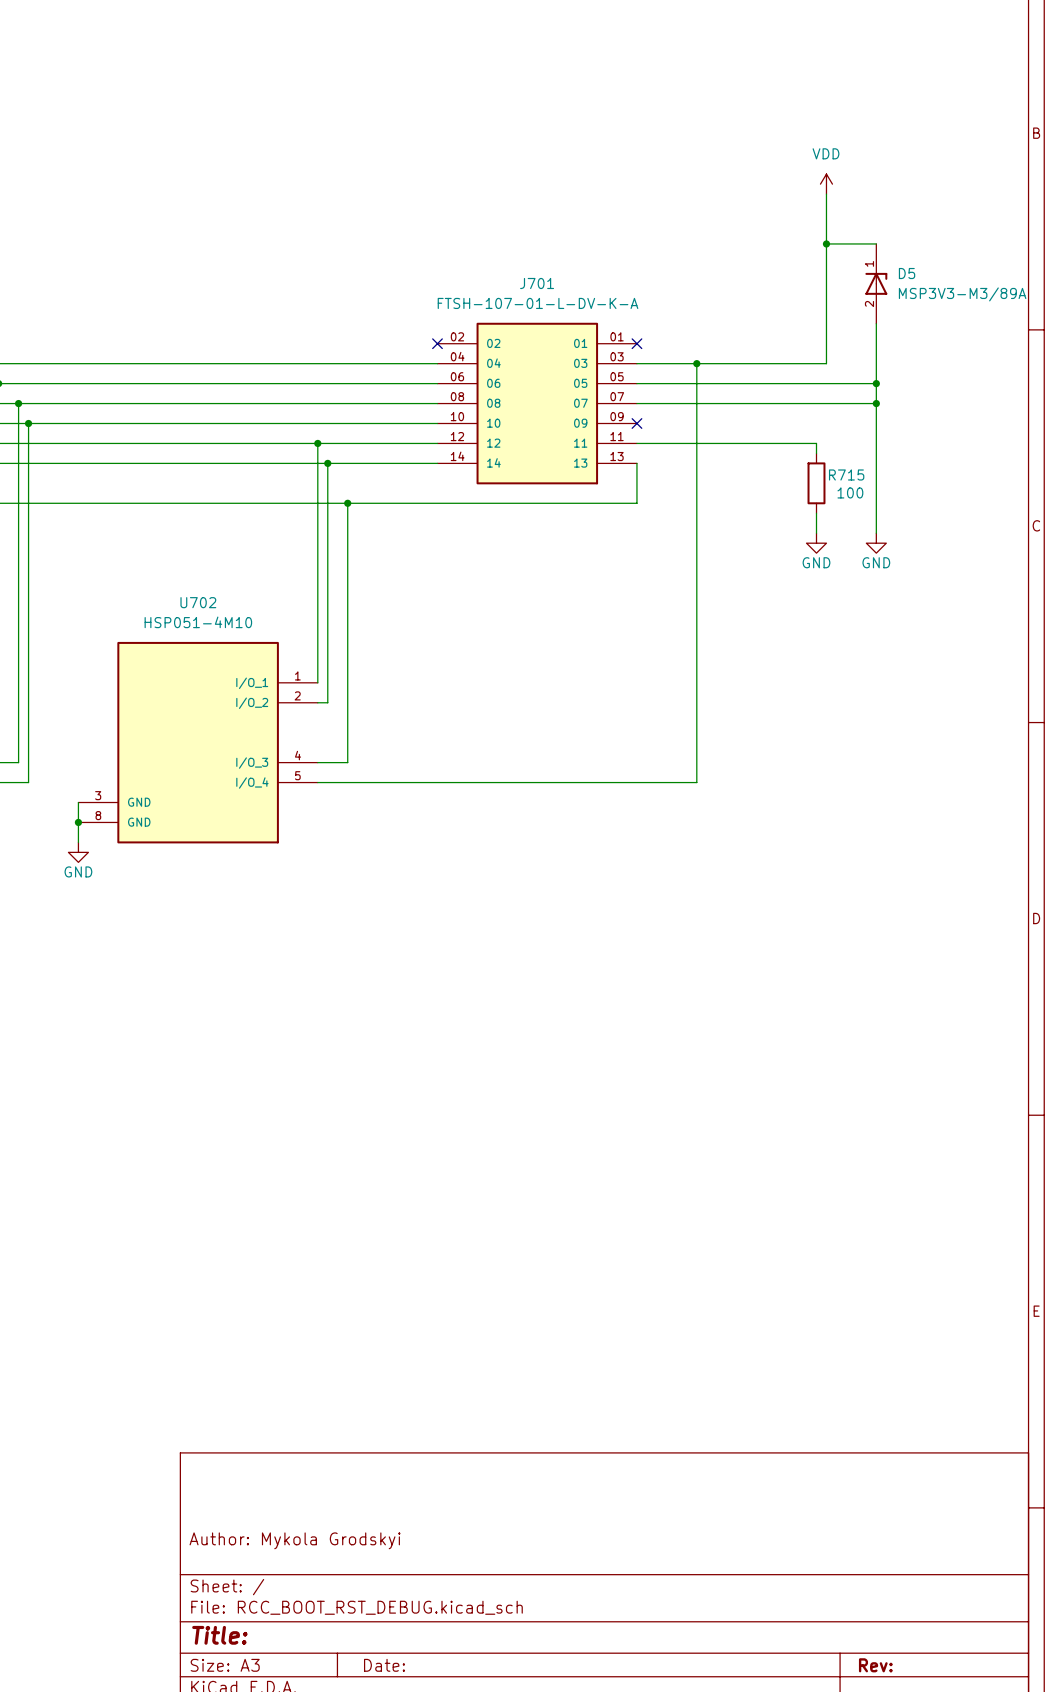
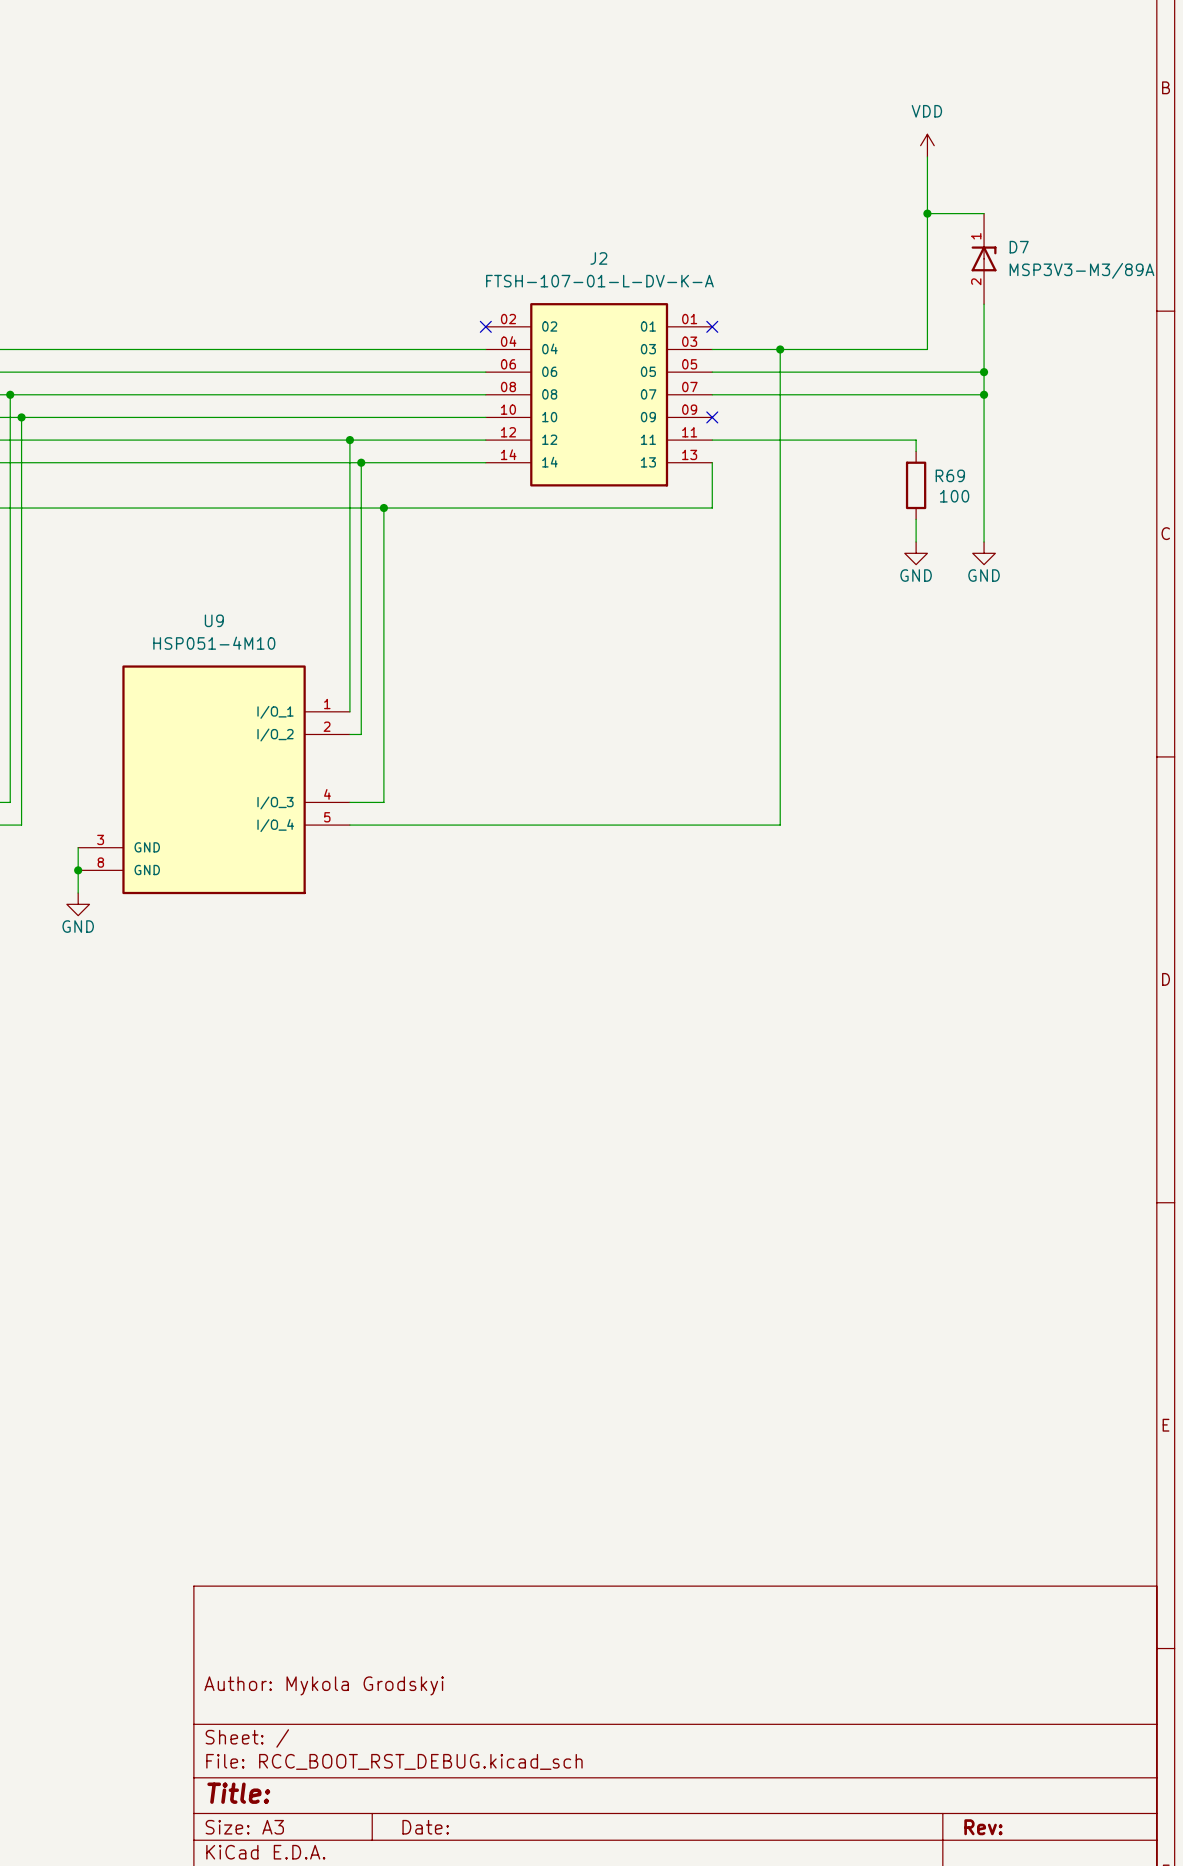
D5 name: D5 (907, 273) -> D7 (1019, 247)
J701 name: J701 (537, 283) -> J2 (598, 258)
R715 name: R715 (846, 474) -> R69 (950, 475)
U702 name: U702 (198, 602) -> U9 (214, 620)

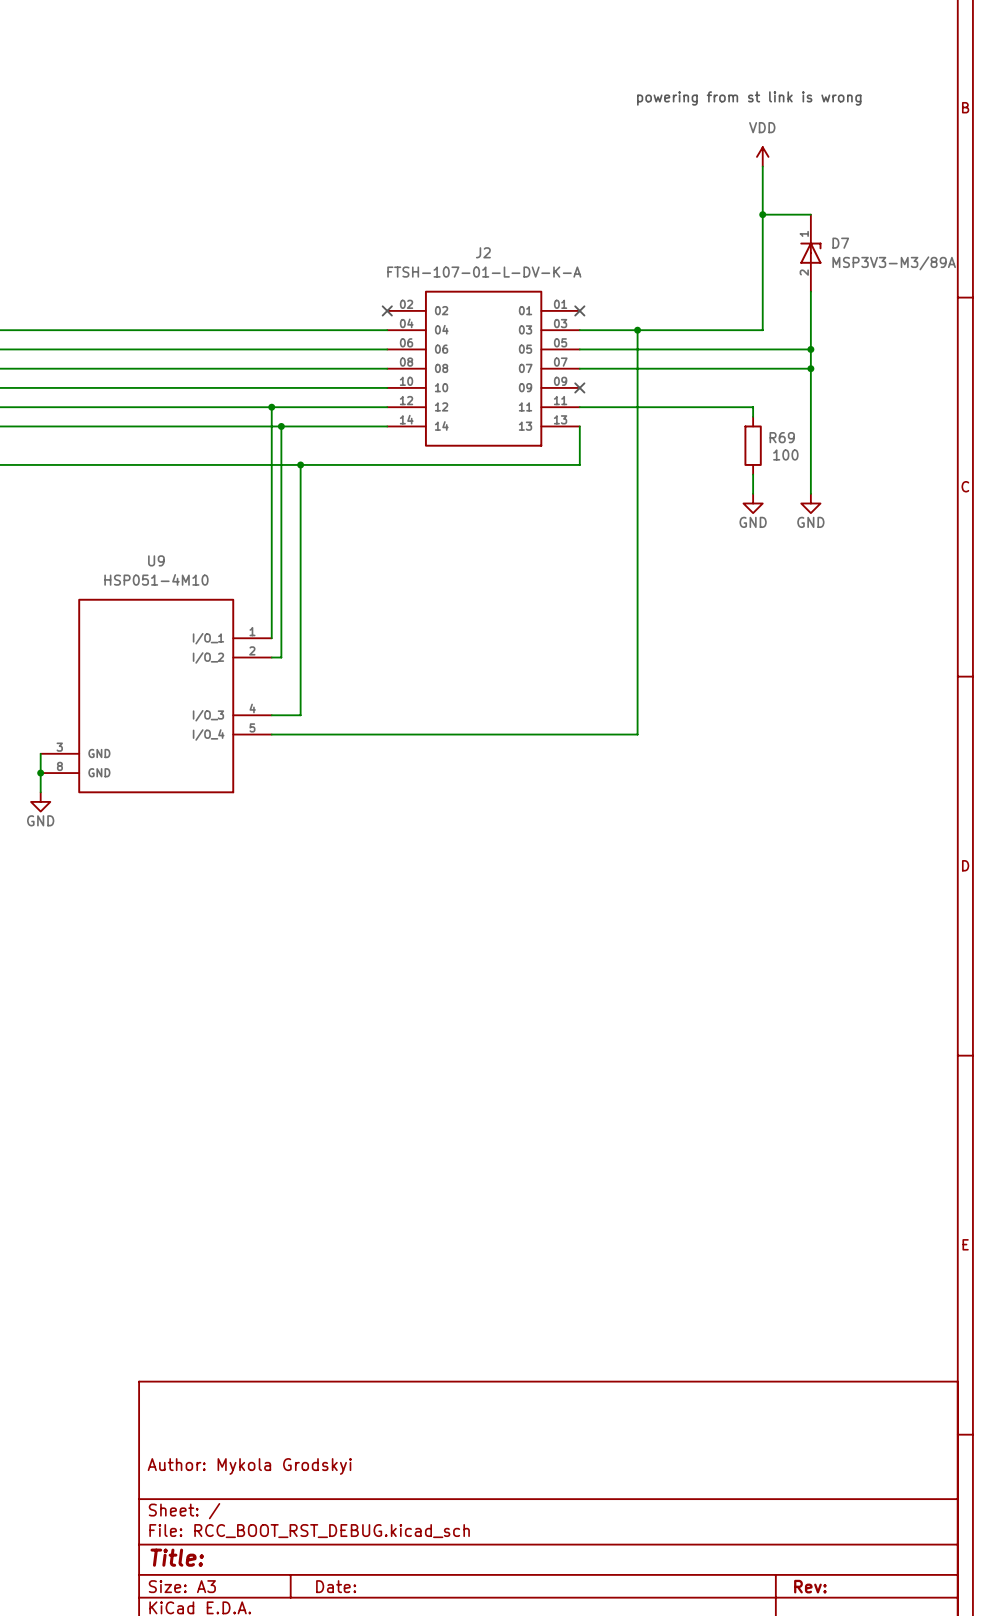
text: none -> powering from st link is wrong (749, 98)

